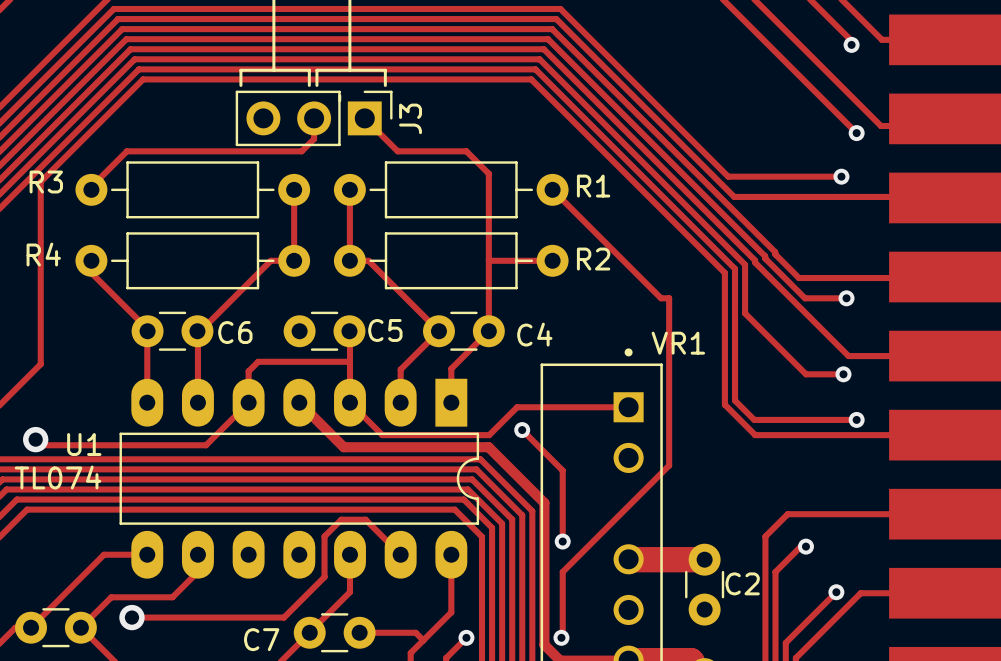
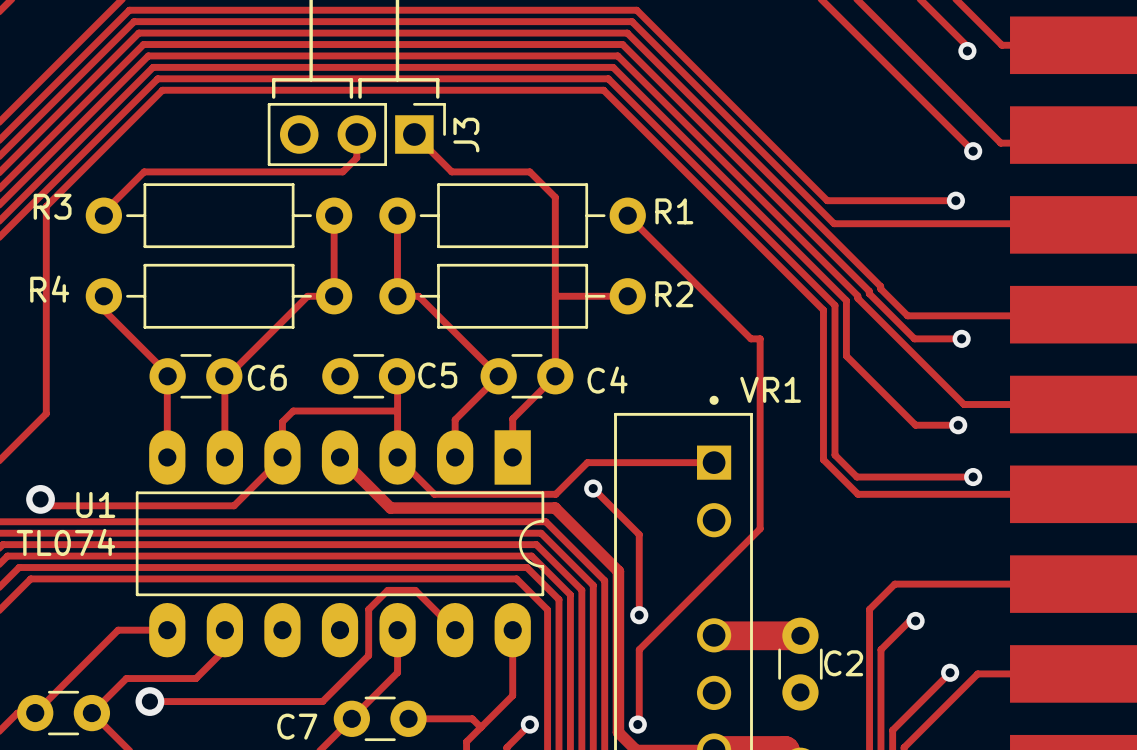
line: (339, 95) (339, 100) -> none

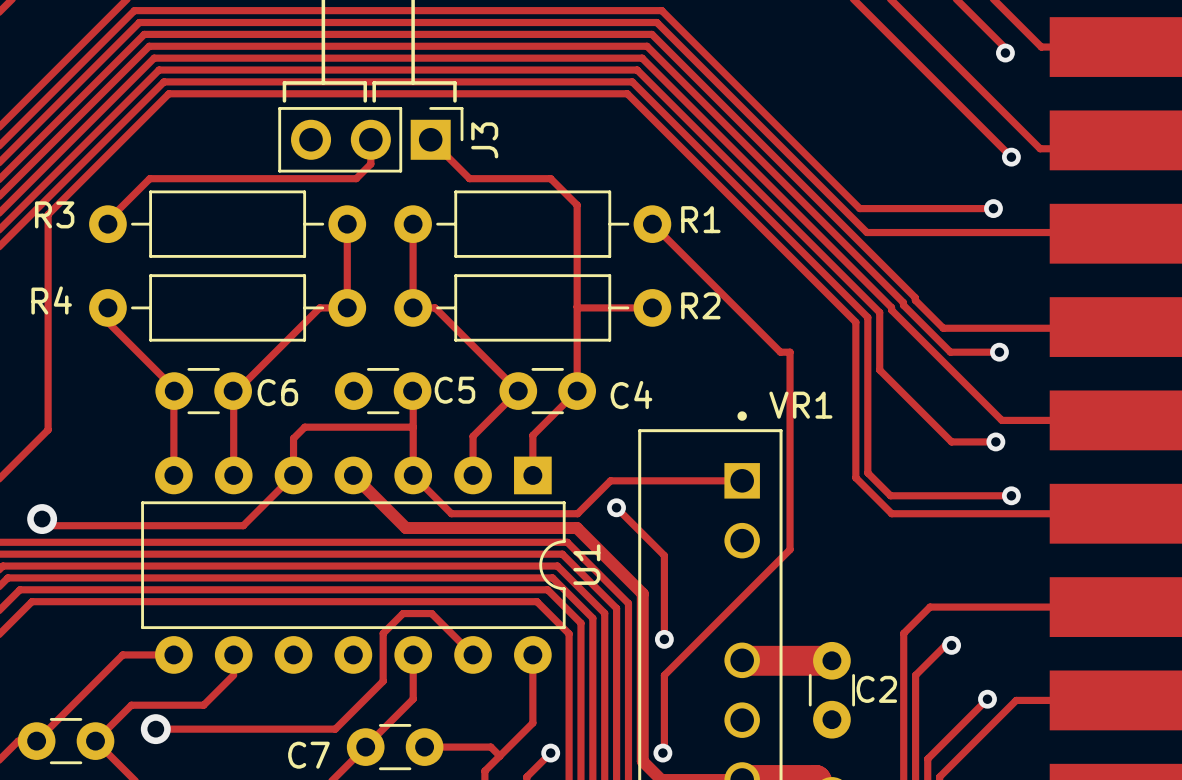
U1 footprint: [135, 430, 545, 658] -> [141, 456, 566, 674]
U1 name position: U1 (95, 504) -> U1 (586, 564)
U1 value: TL074 (65, 542) -> none

